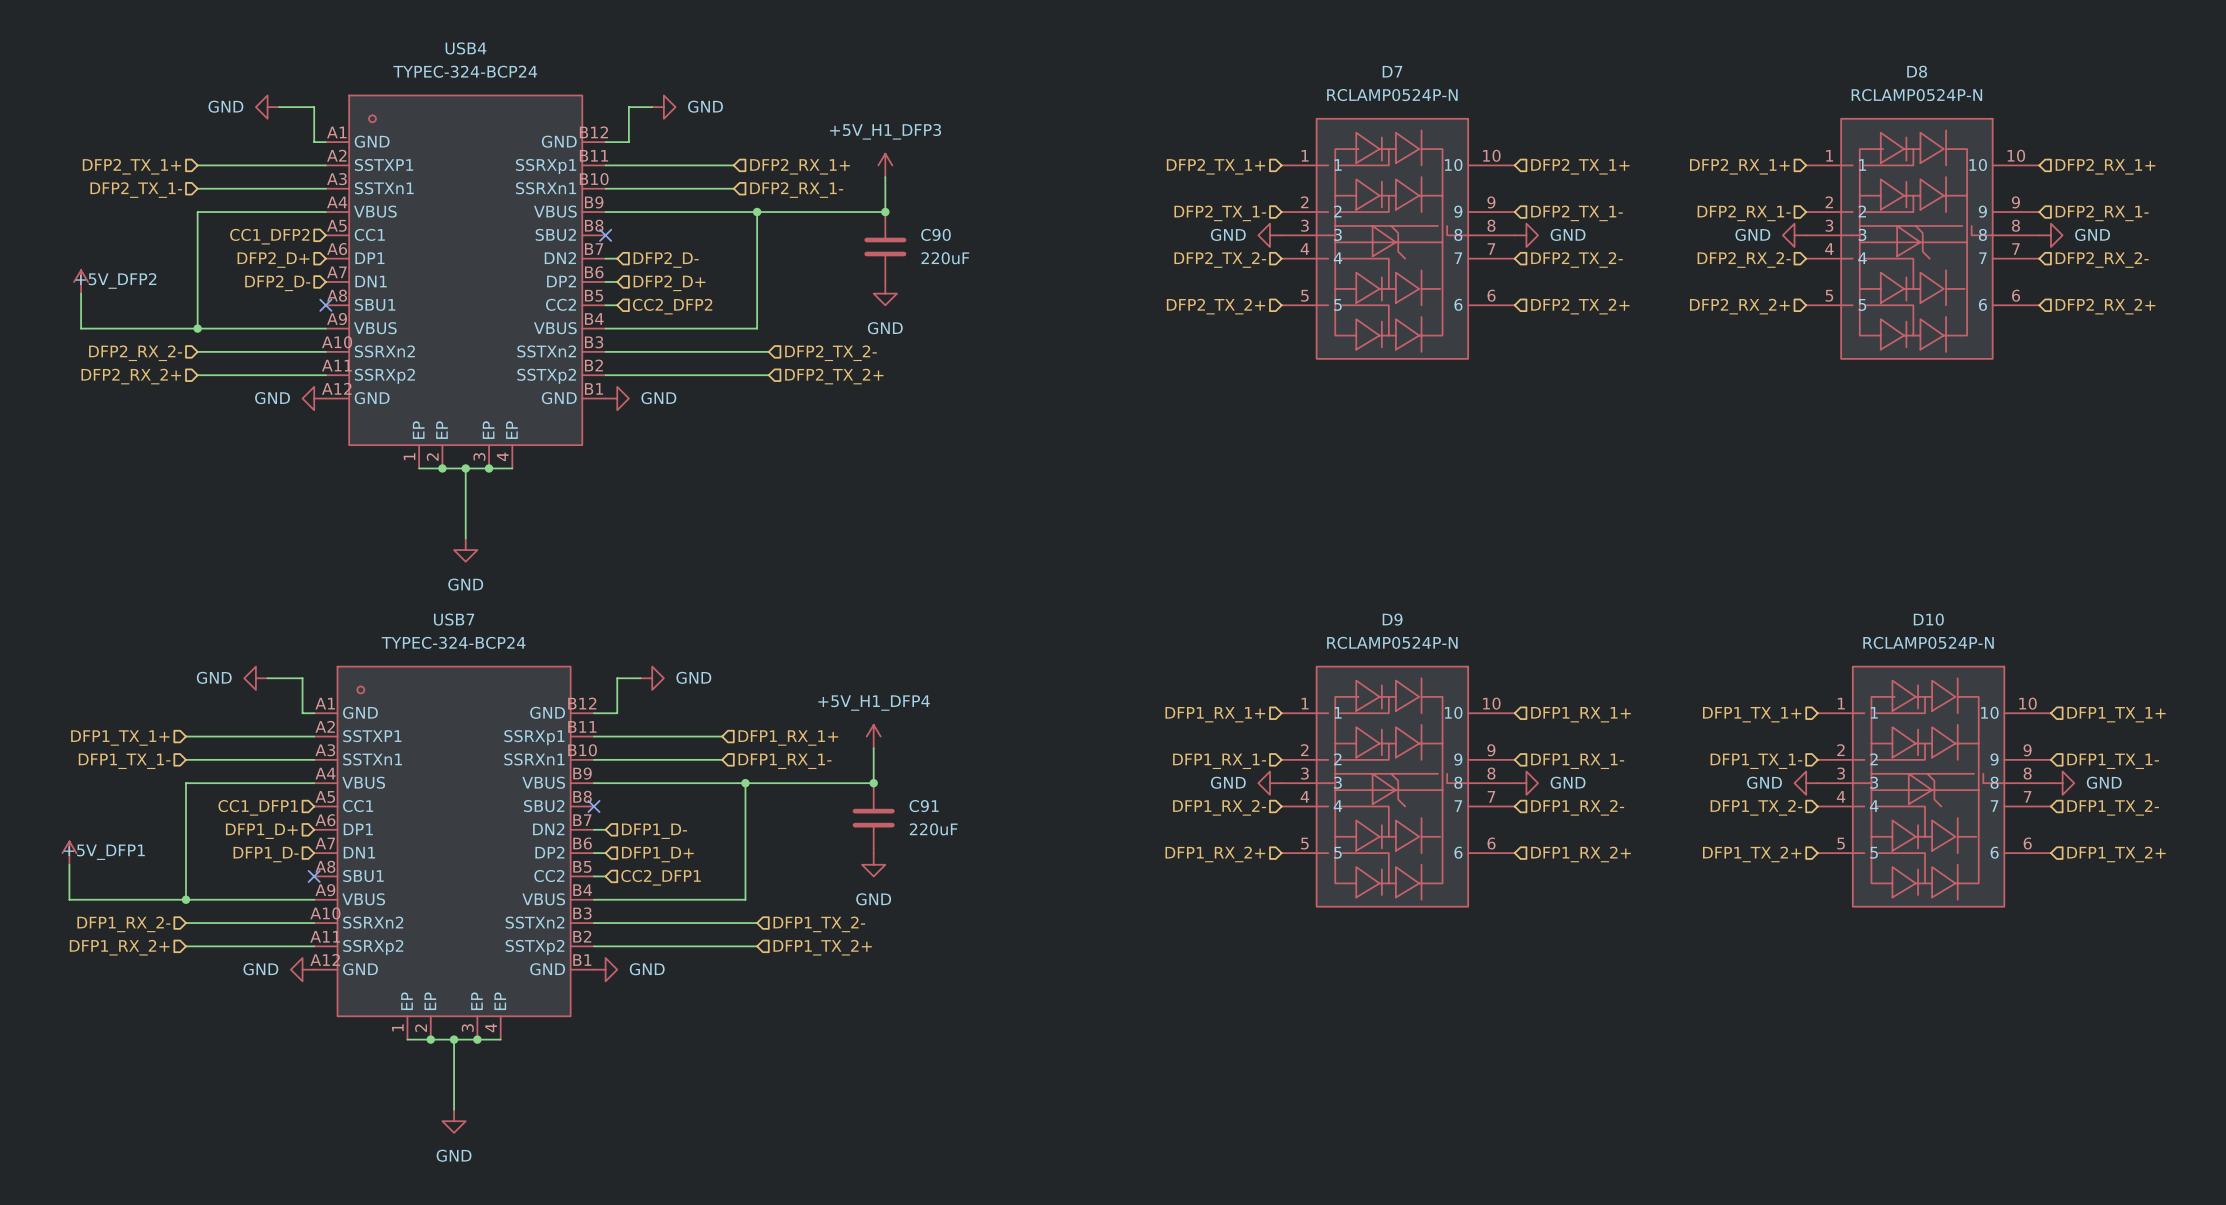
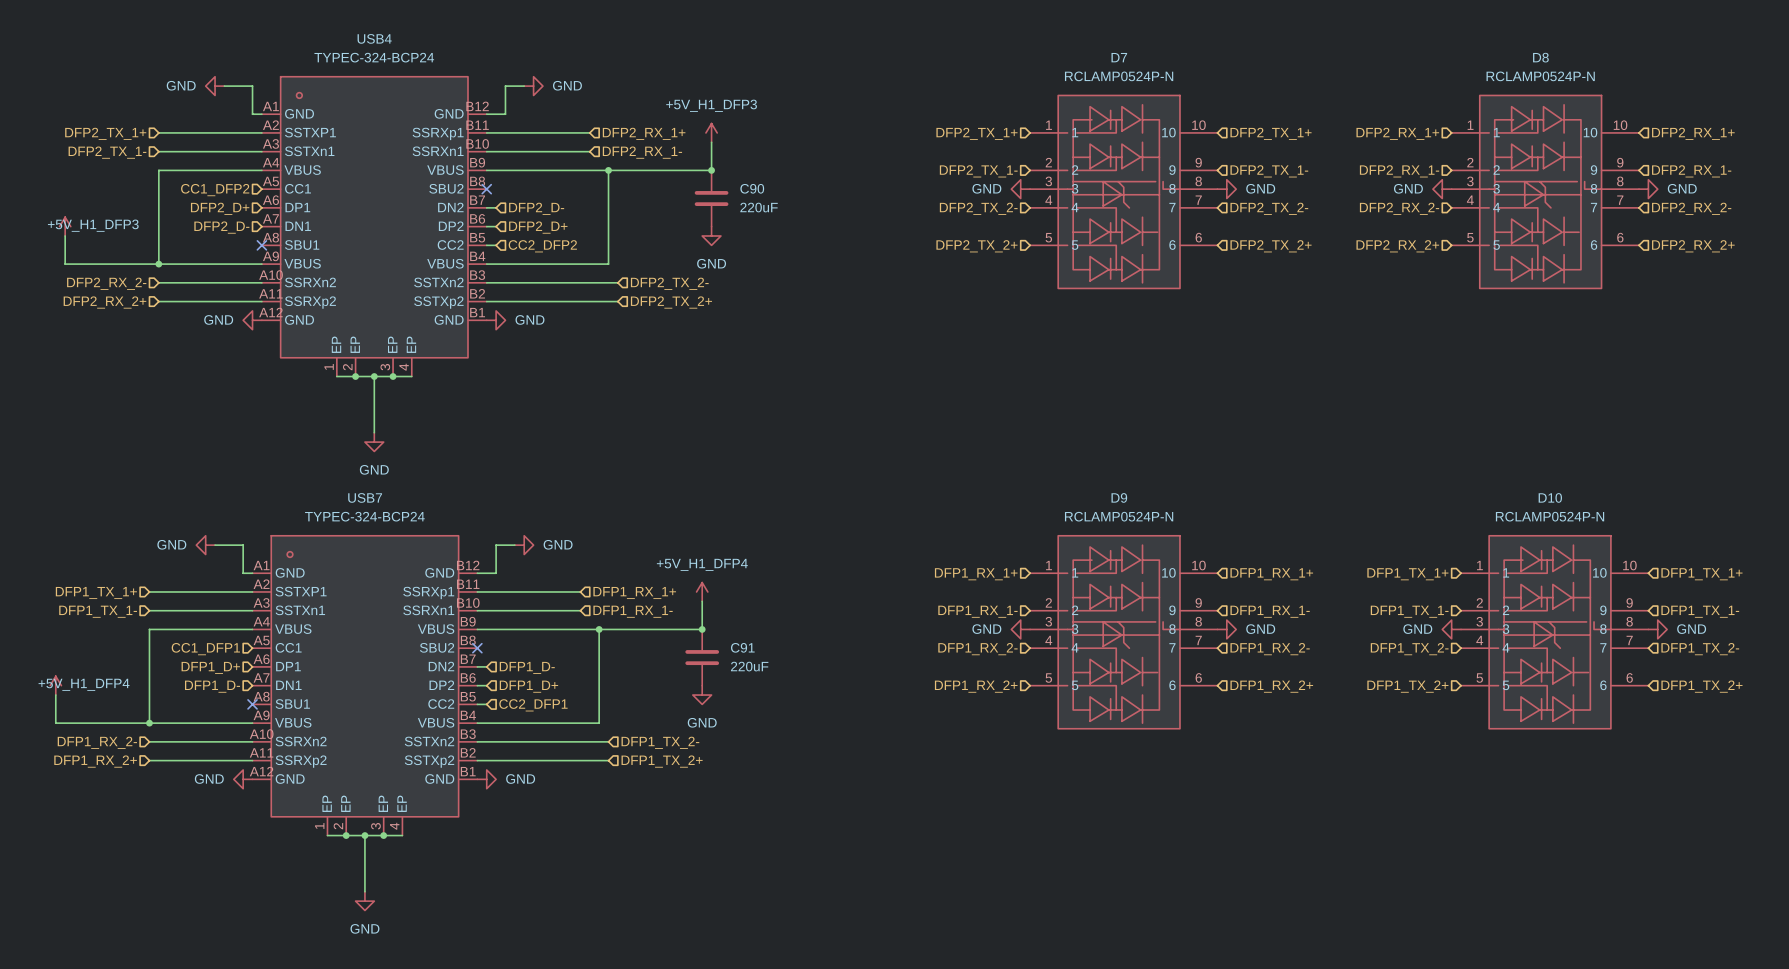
power symbol: +5V_DFP2 (81, 281) -> +5V_H1_DFP3 (65, 226)
power symbol: +5V_DFP1 (69, 853) -> +5V_H1_DFP4 (55, 685)

